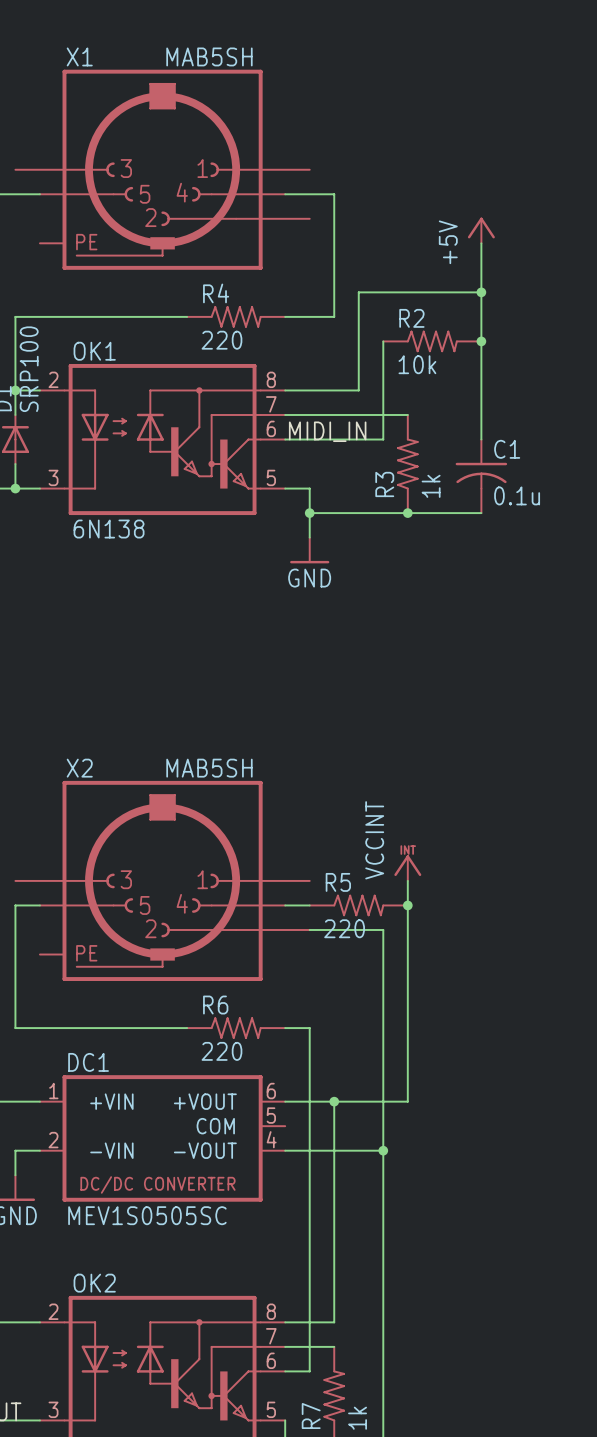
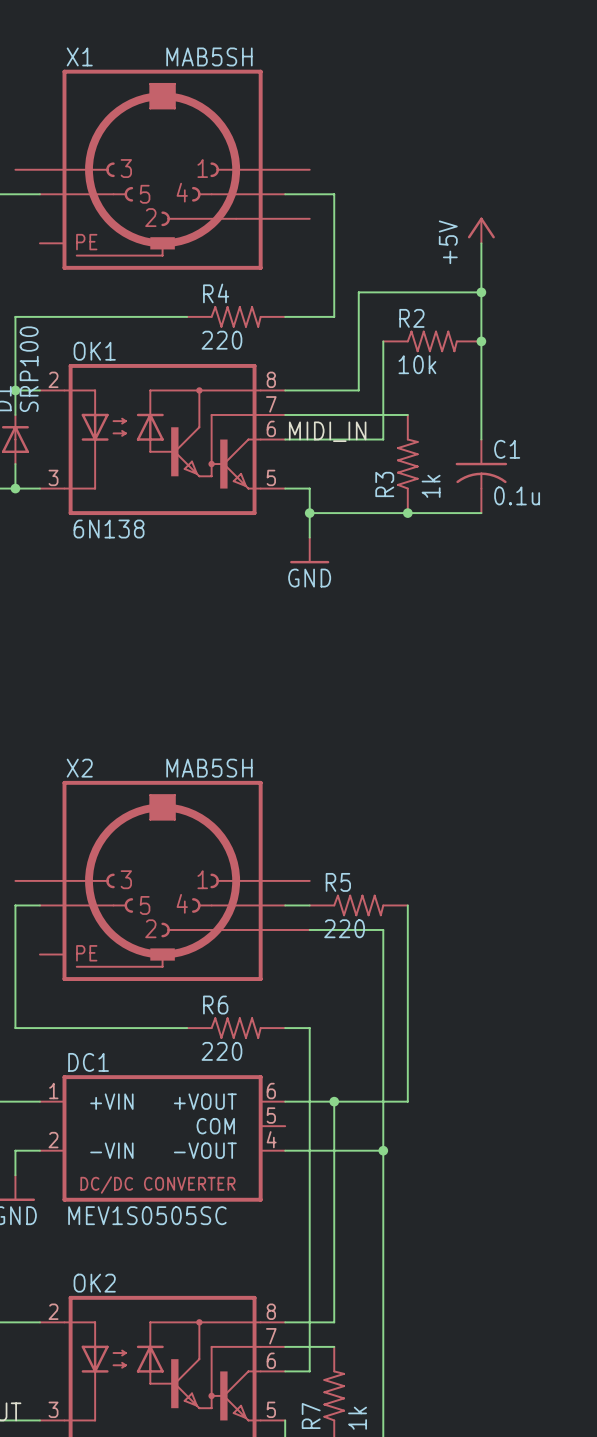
power symbol: VCCINT (407, 868) -> none
wire: (407, 880) (407, 905) -> none
junction: (407, 905) -> none

